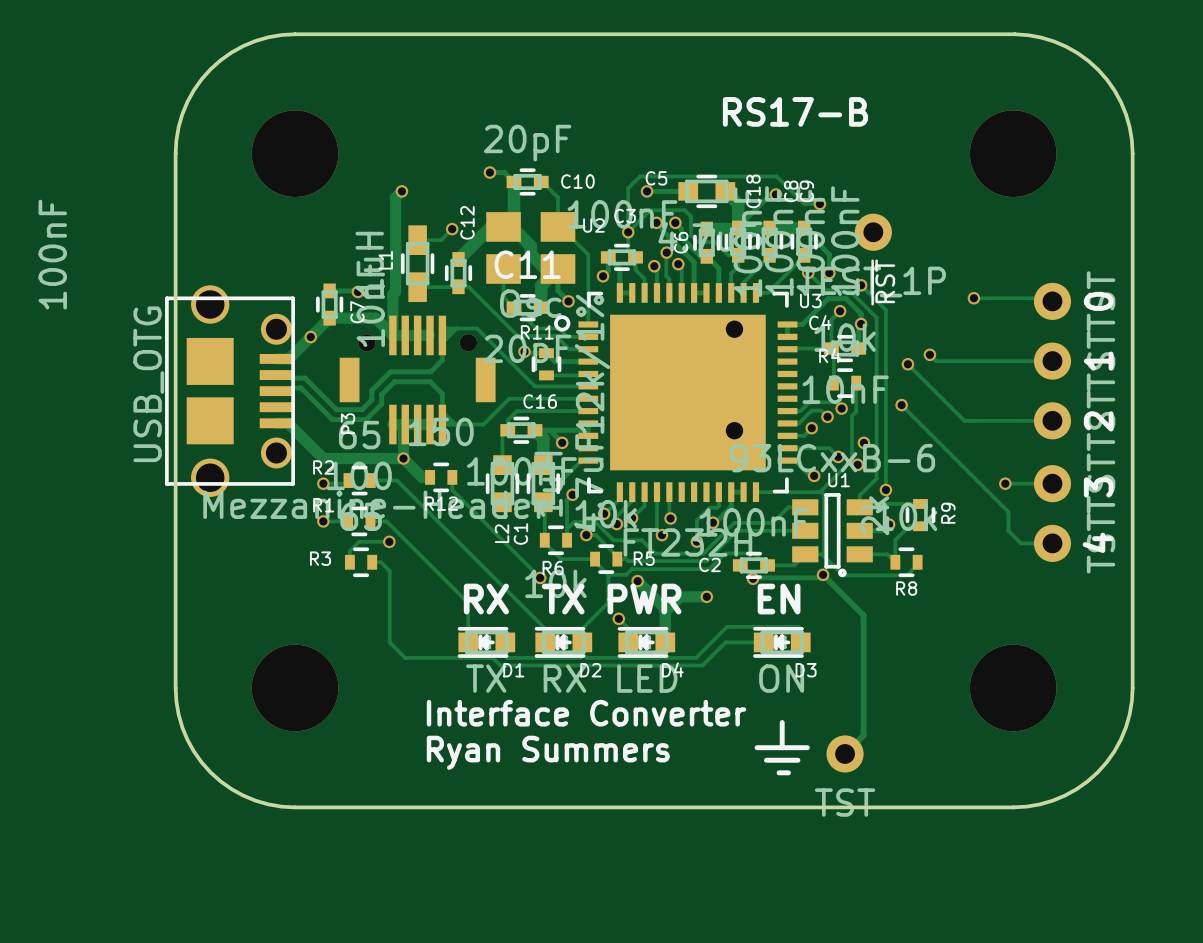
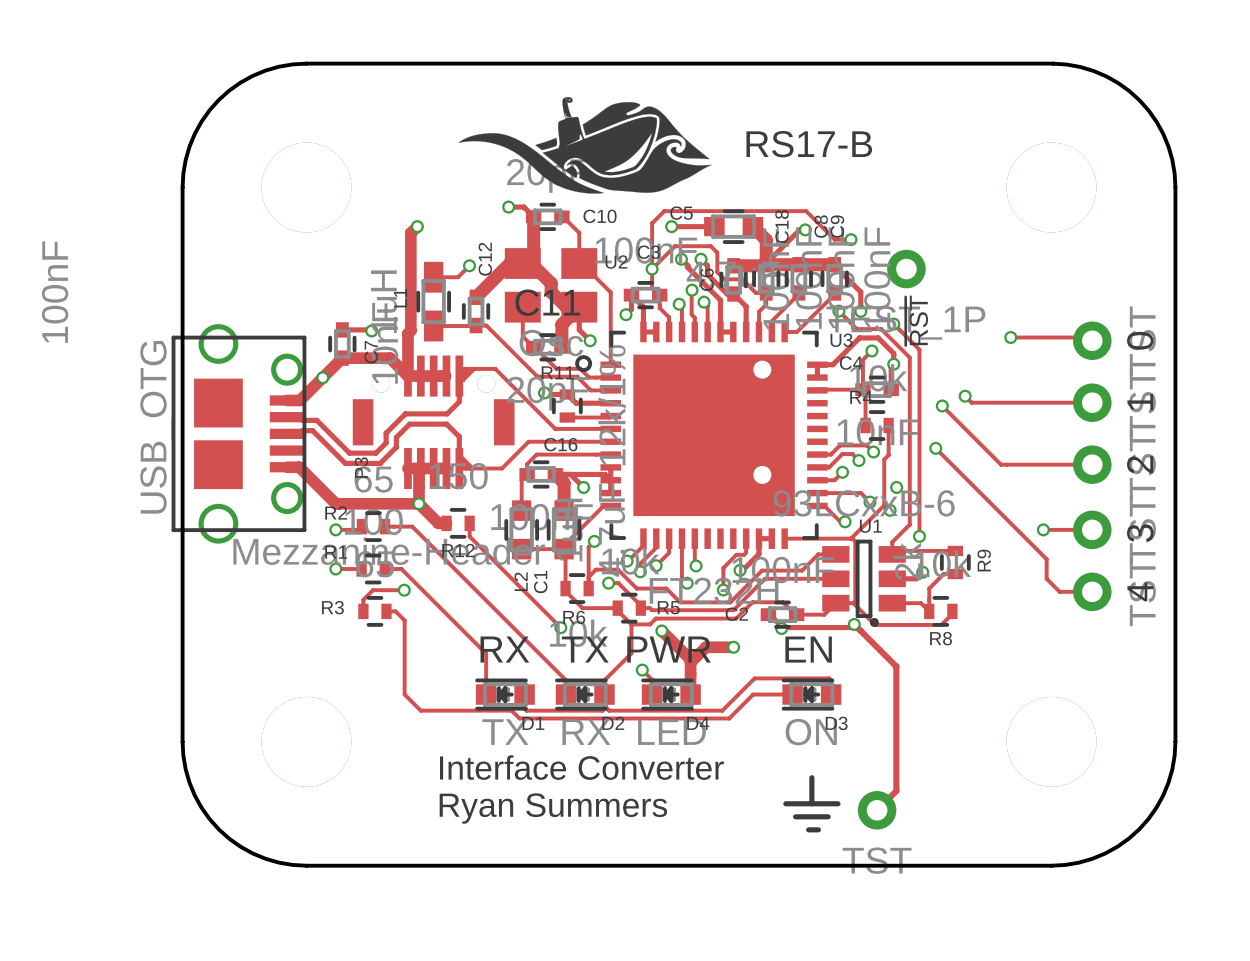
drawing: none -> [458, 97, 712, 194]

